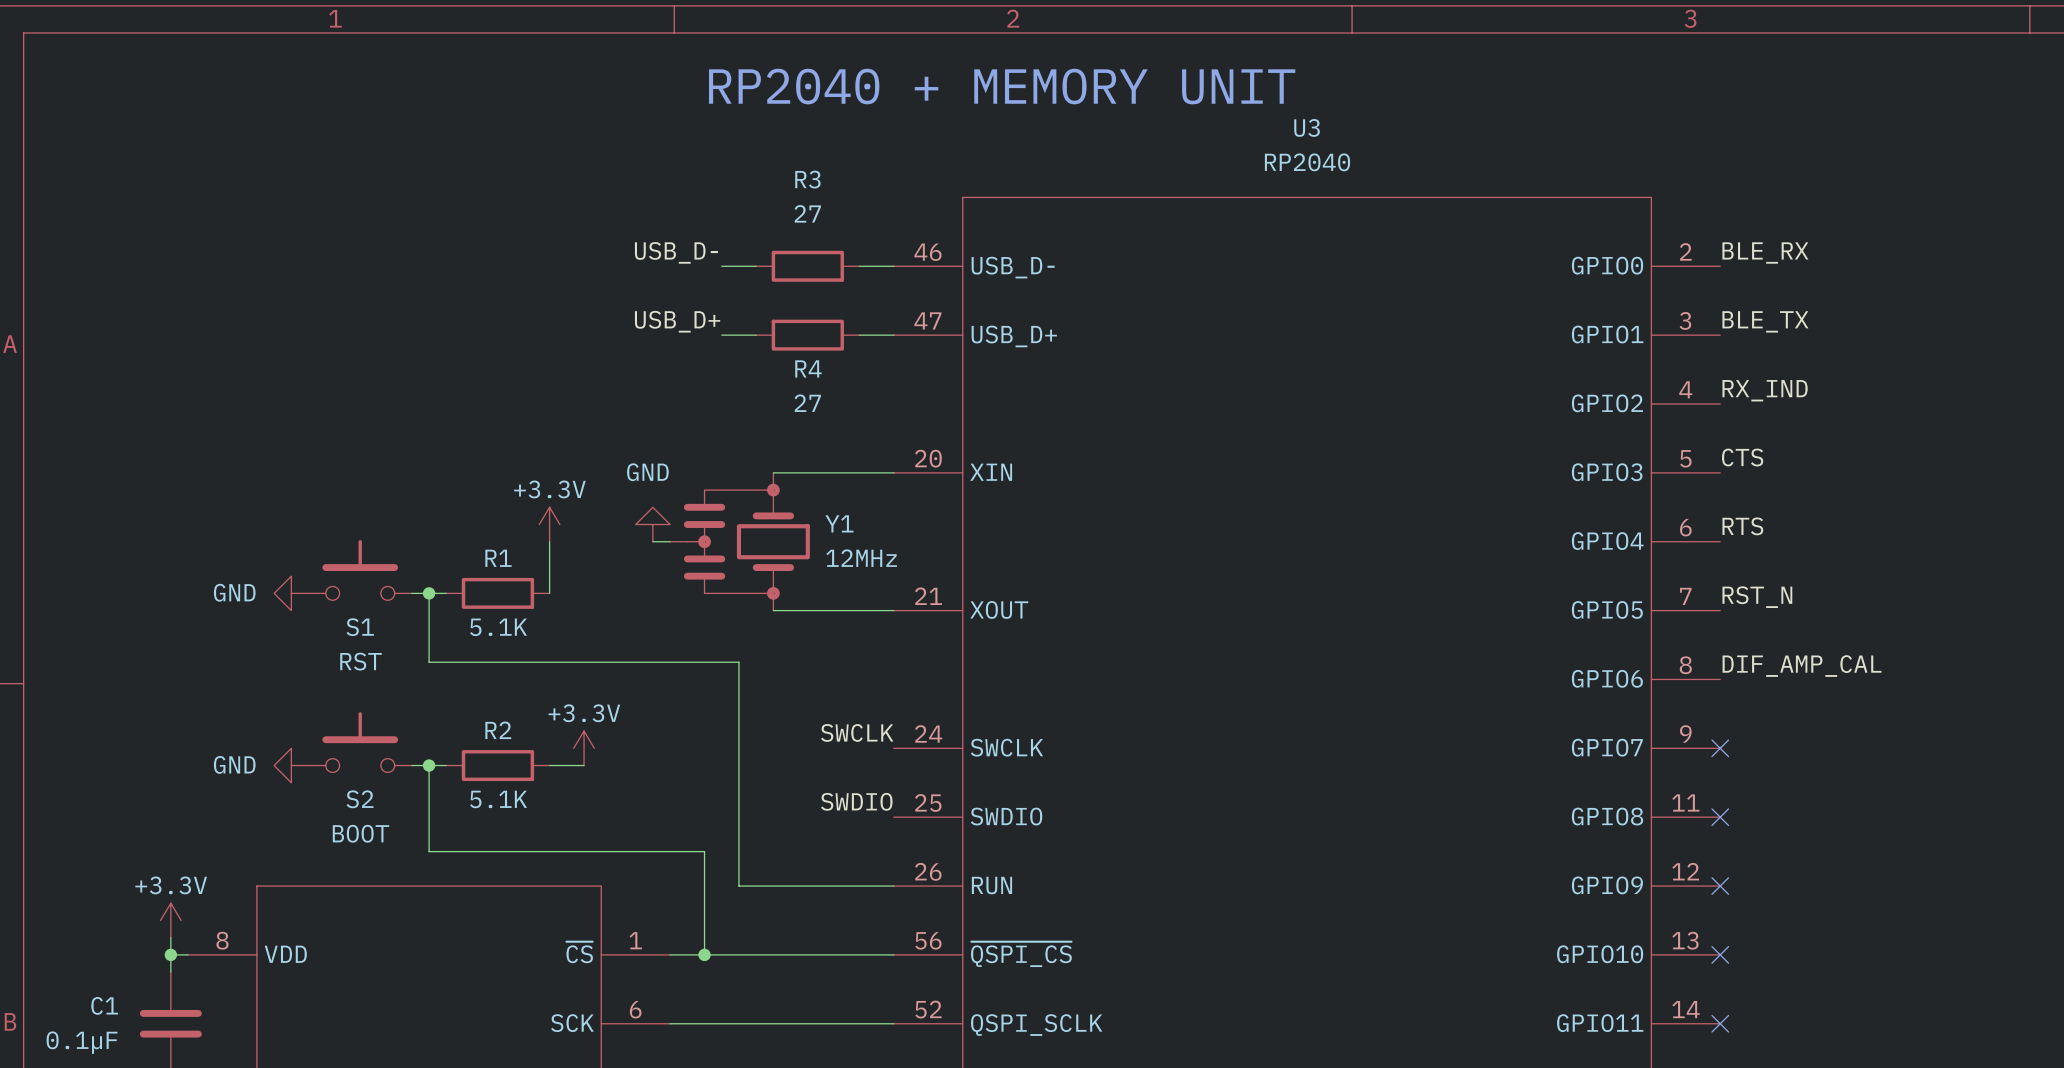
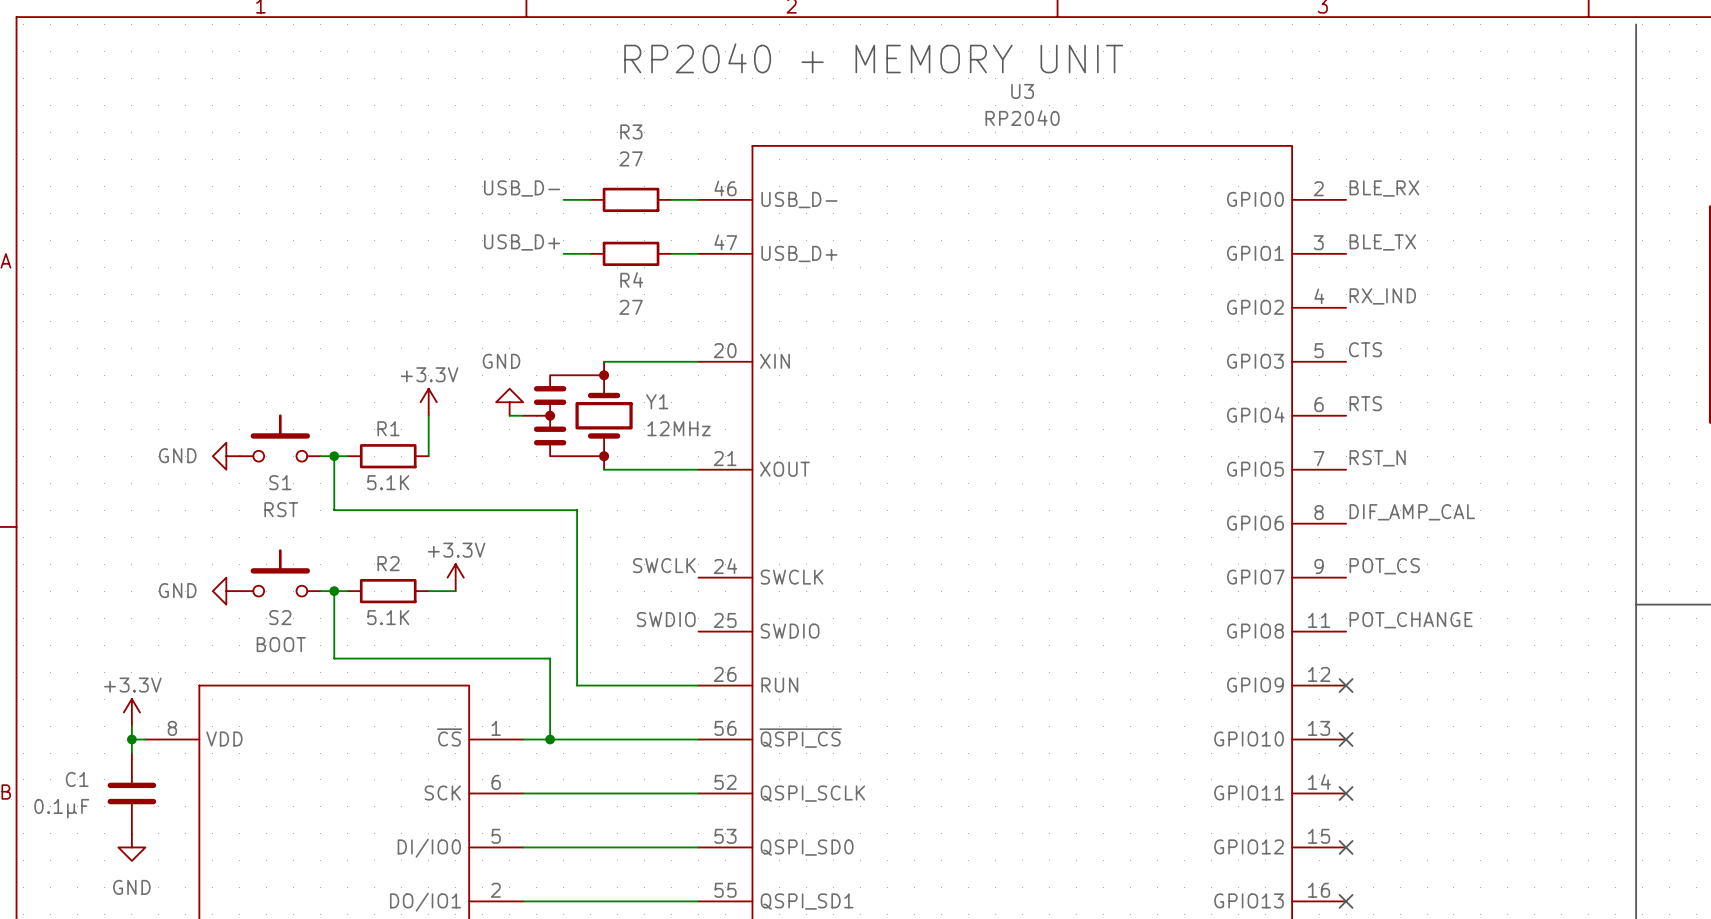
text position: RP2040 + MEMORY UNIT (1002, 86) -> RP2040 + MEMORY UNIT (873, 58)
label: none -> POT_CS (1384, 566)
no-connect mark: (1720, 748) -> none
label: none -> POT_CHANGE (1411, 620)
no-connect mark: (1720, 817) -> none

